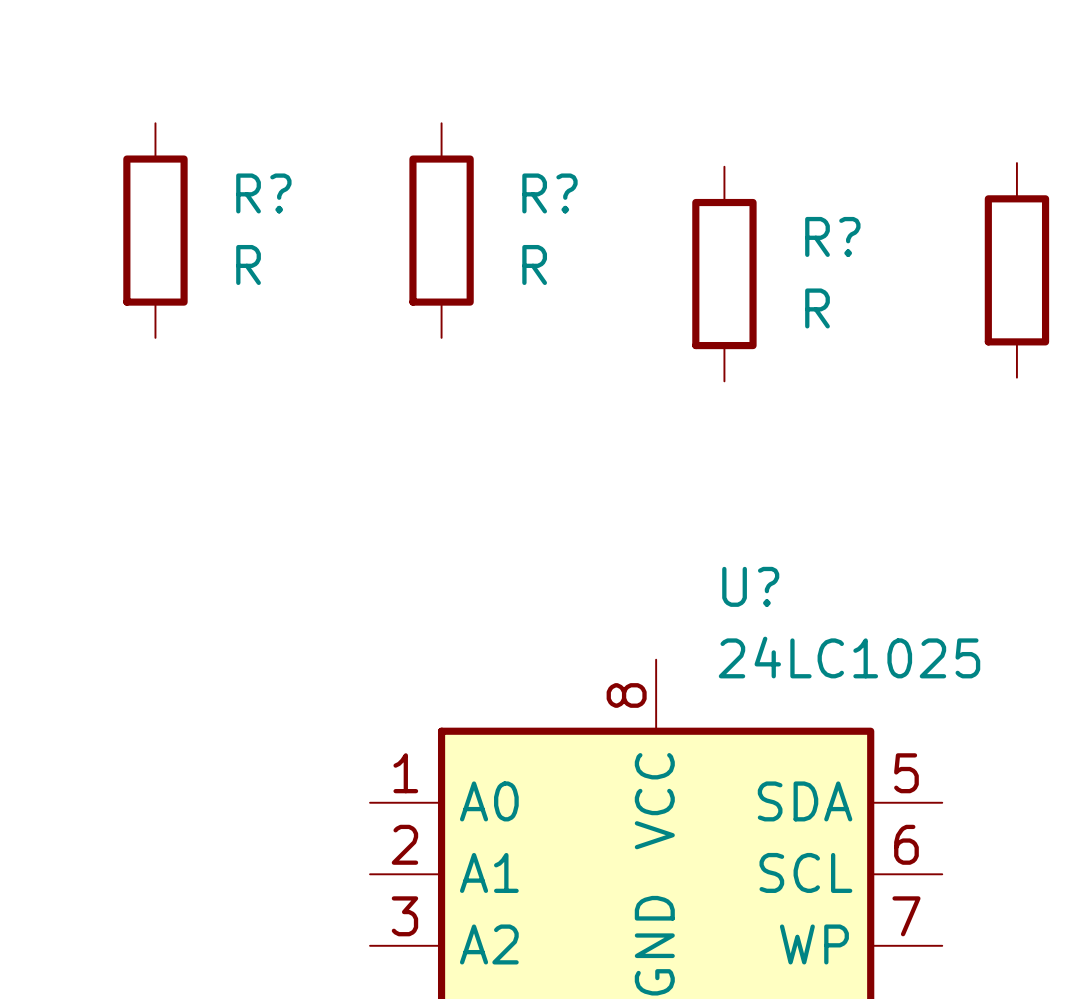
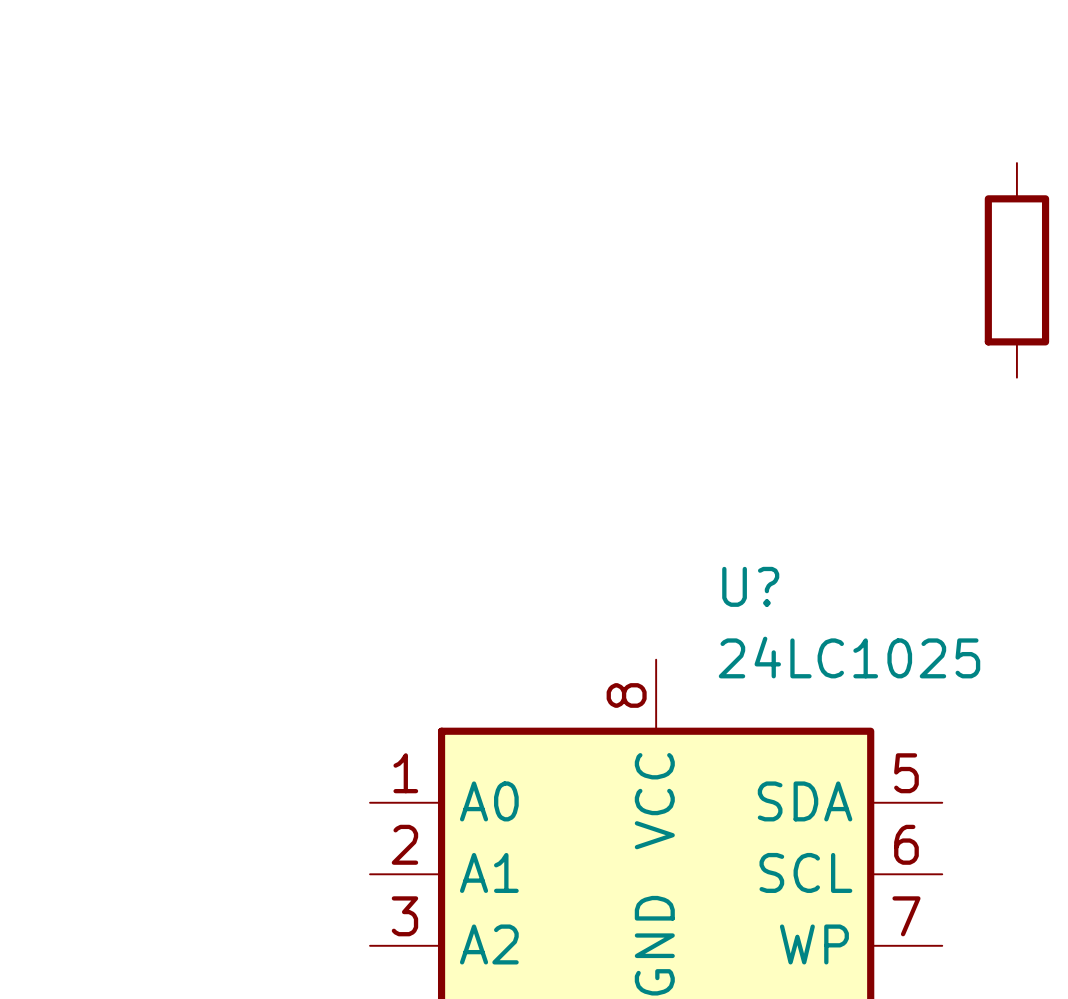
R?: R (155, 230) -> none
R?: R (441, 230) -> none
R?: R (724, 274) -> none

